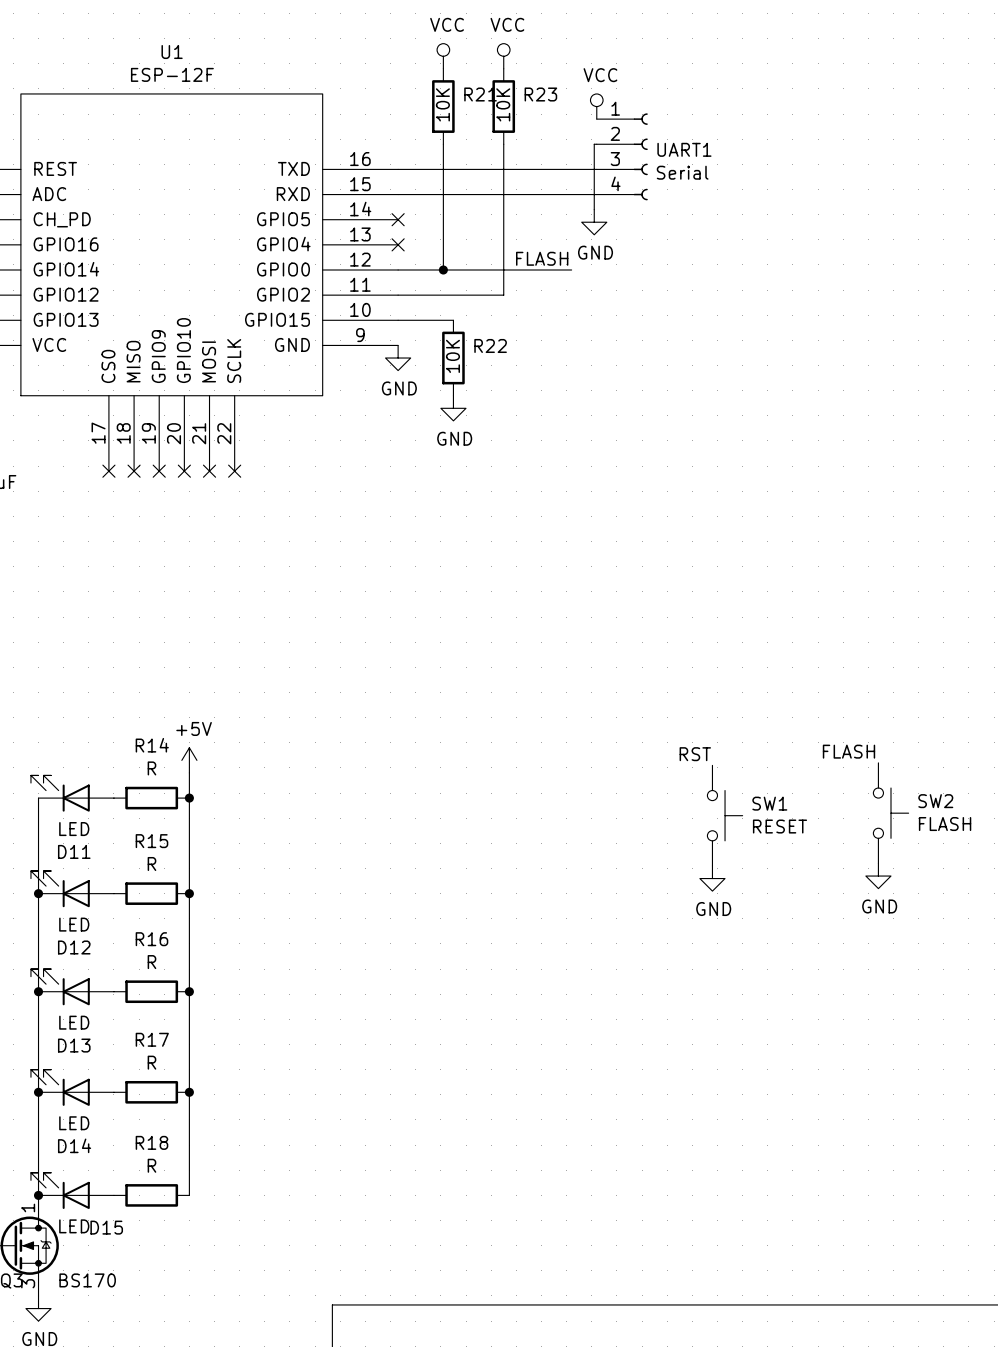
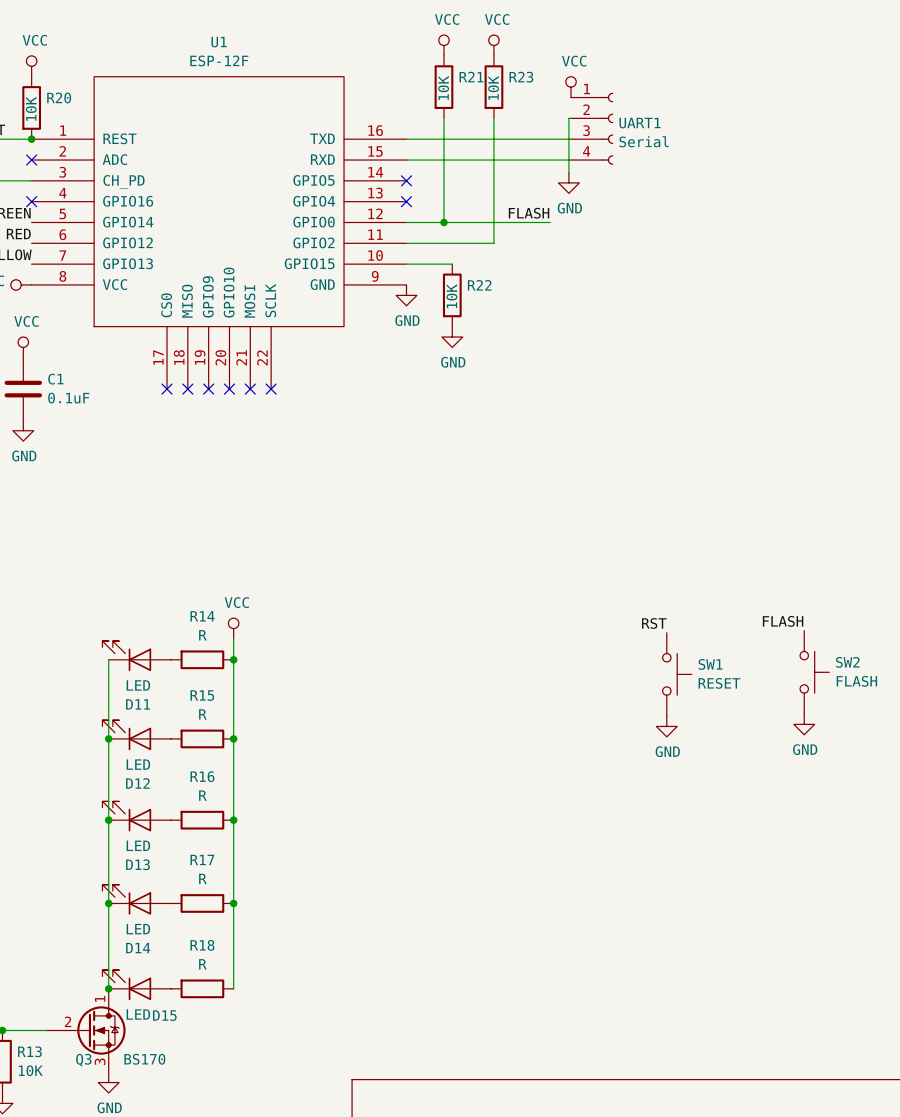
power symbol: +5V (189, 760) -> VCC (233, 628)

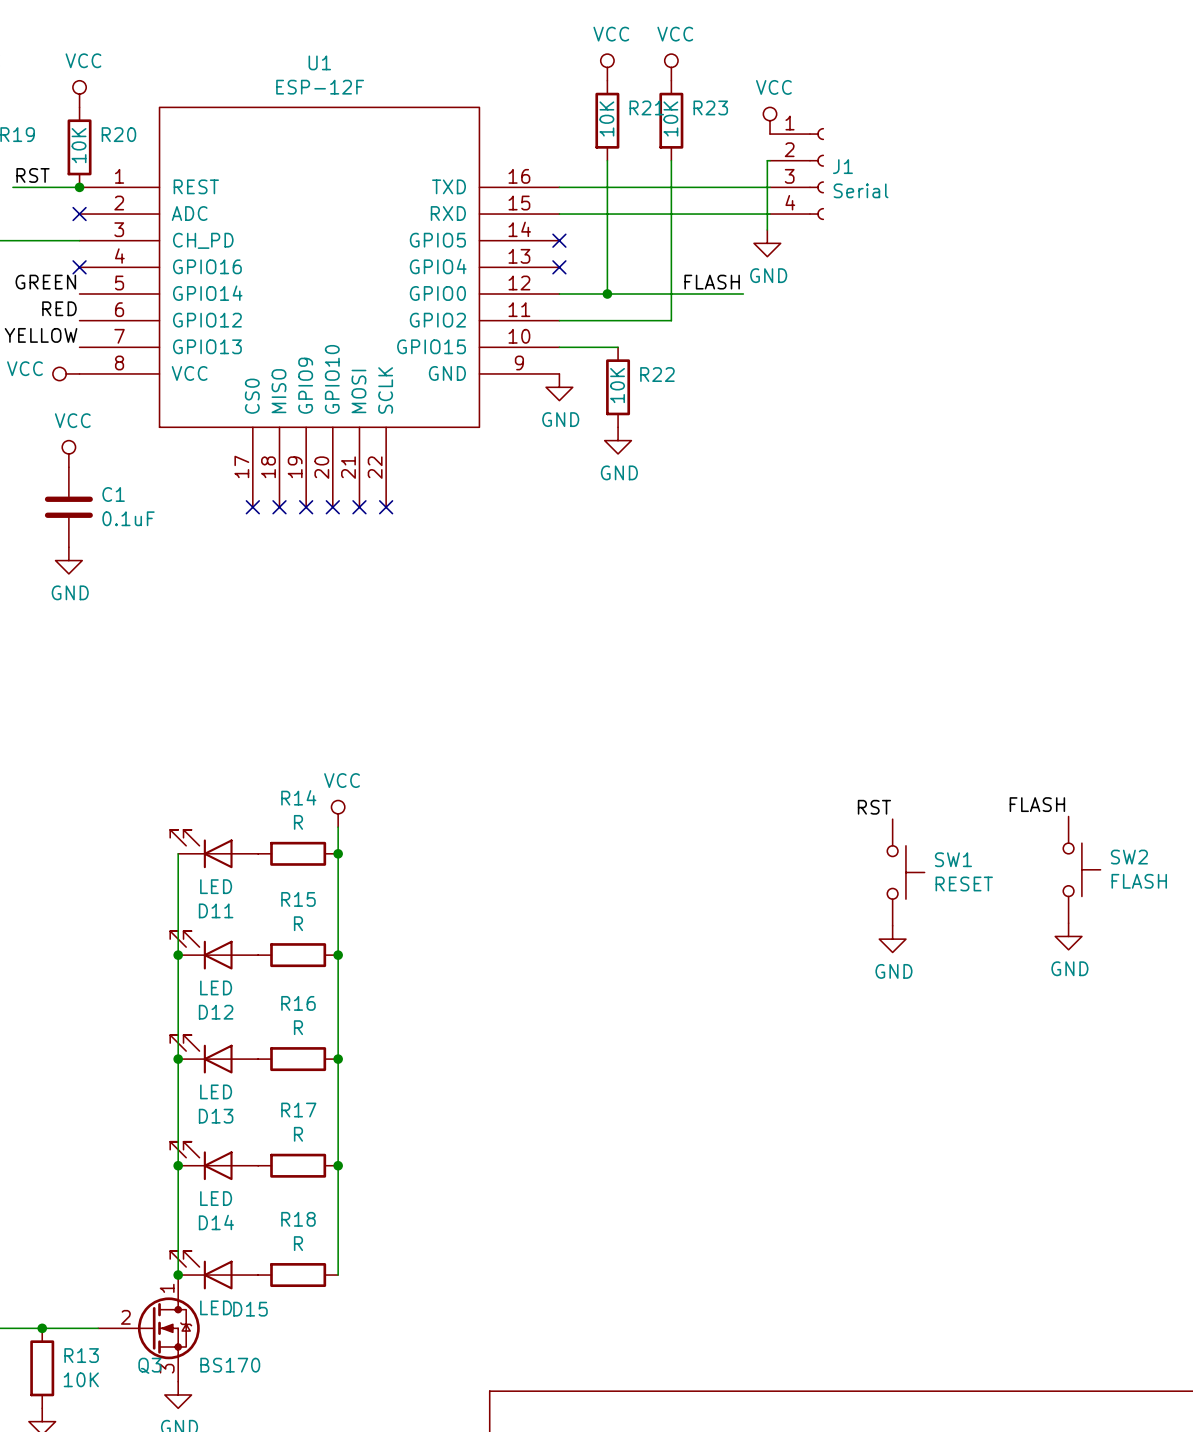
UART1 name: UART1 (640, 123) -> J1 (842, 166)

